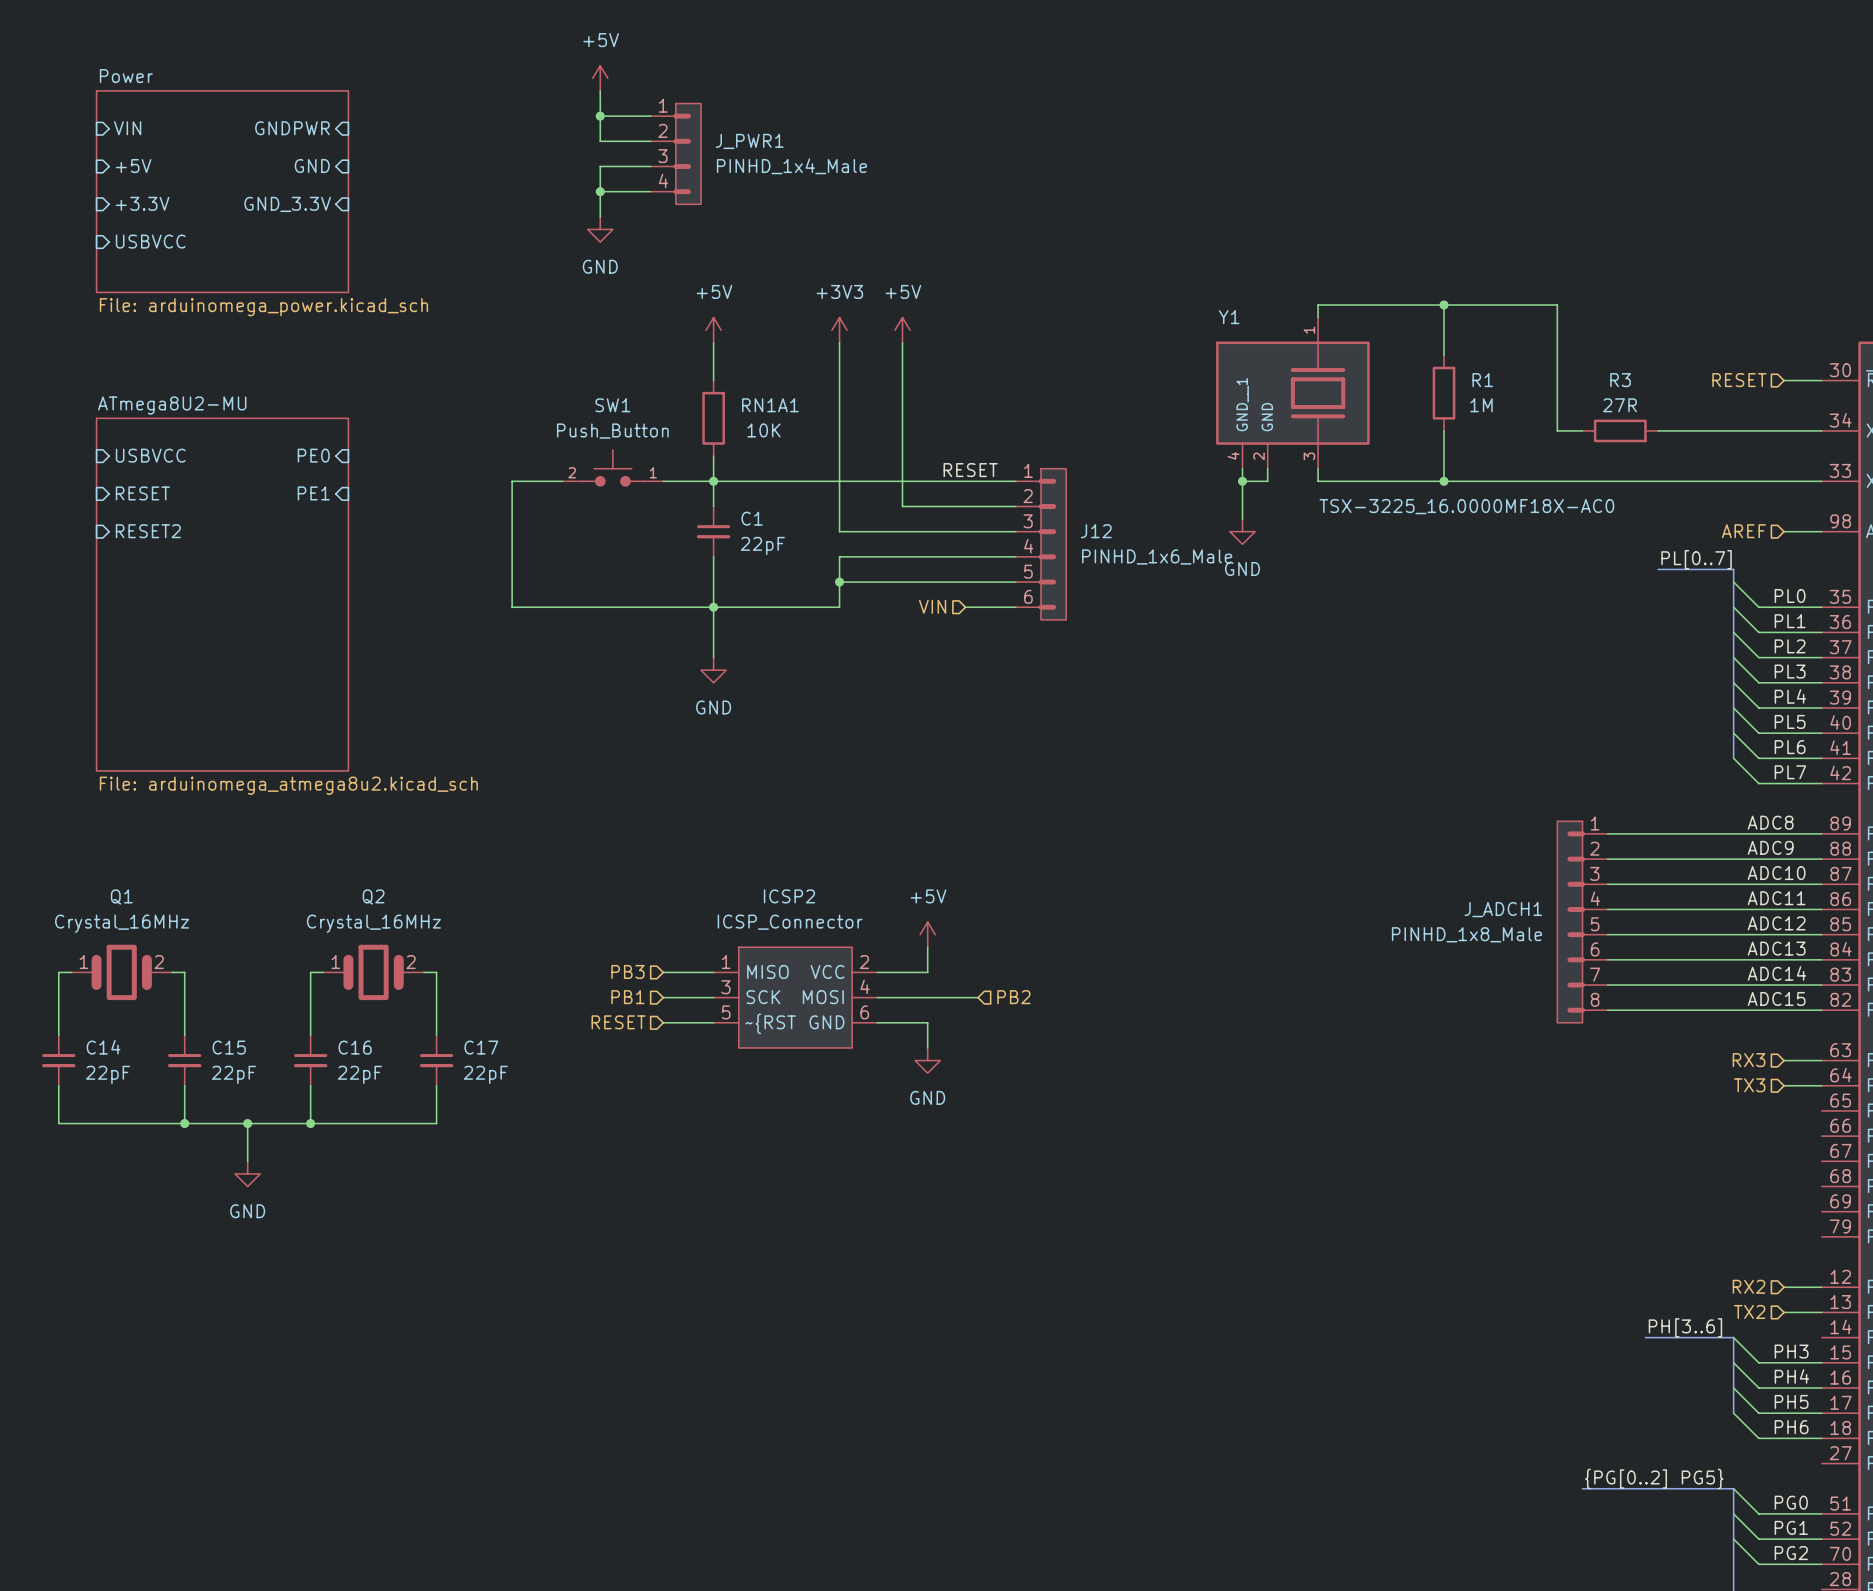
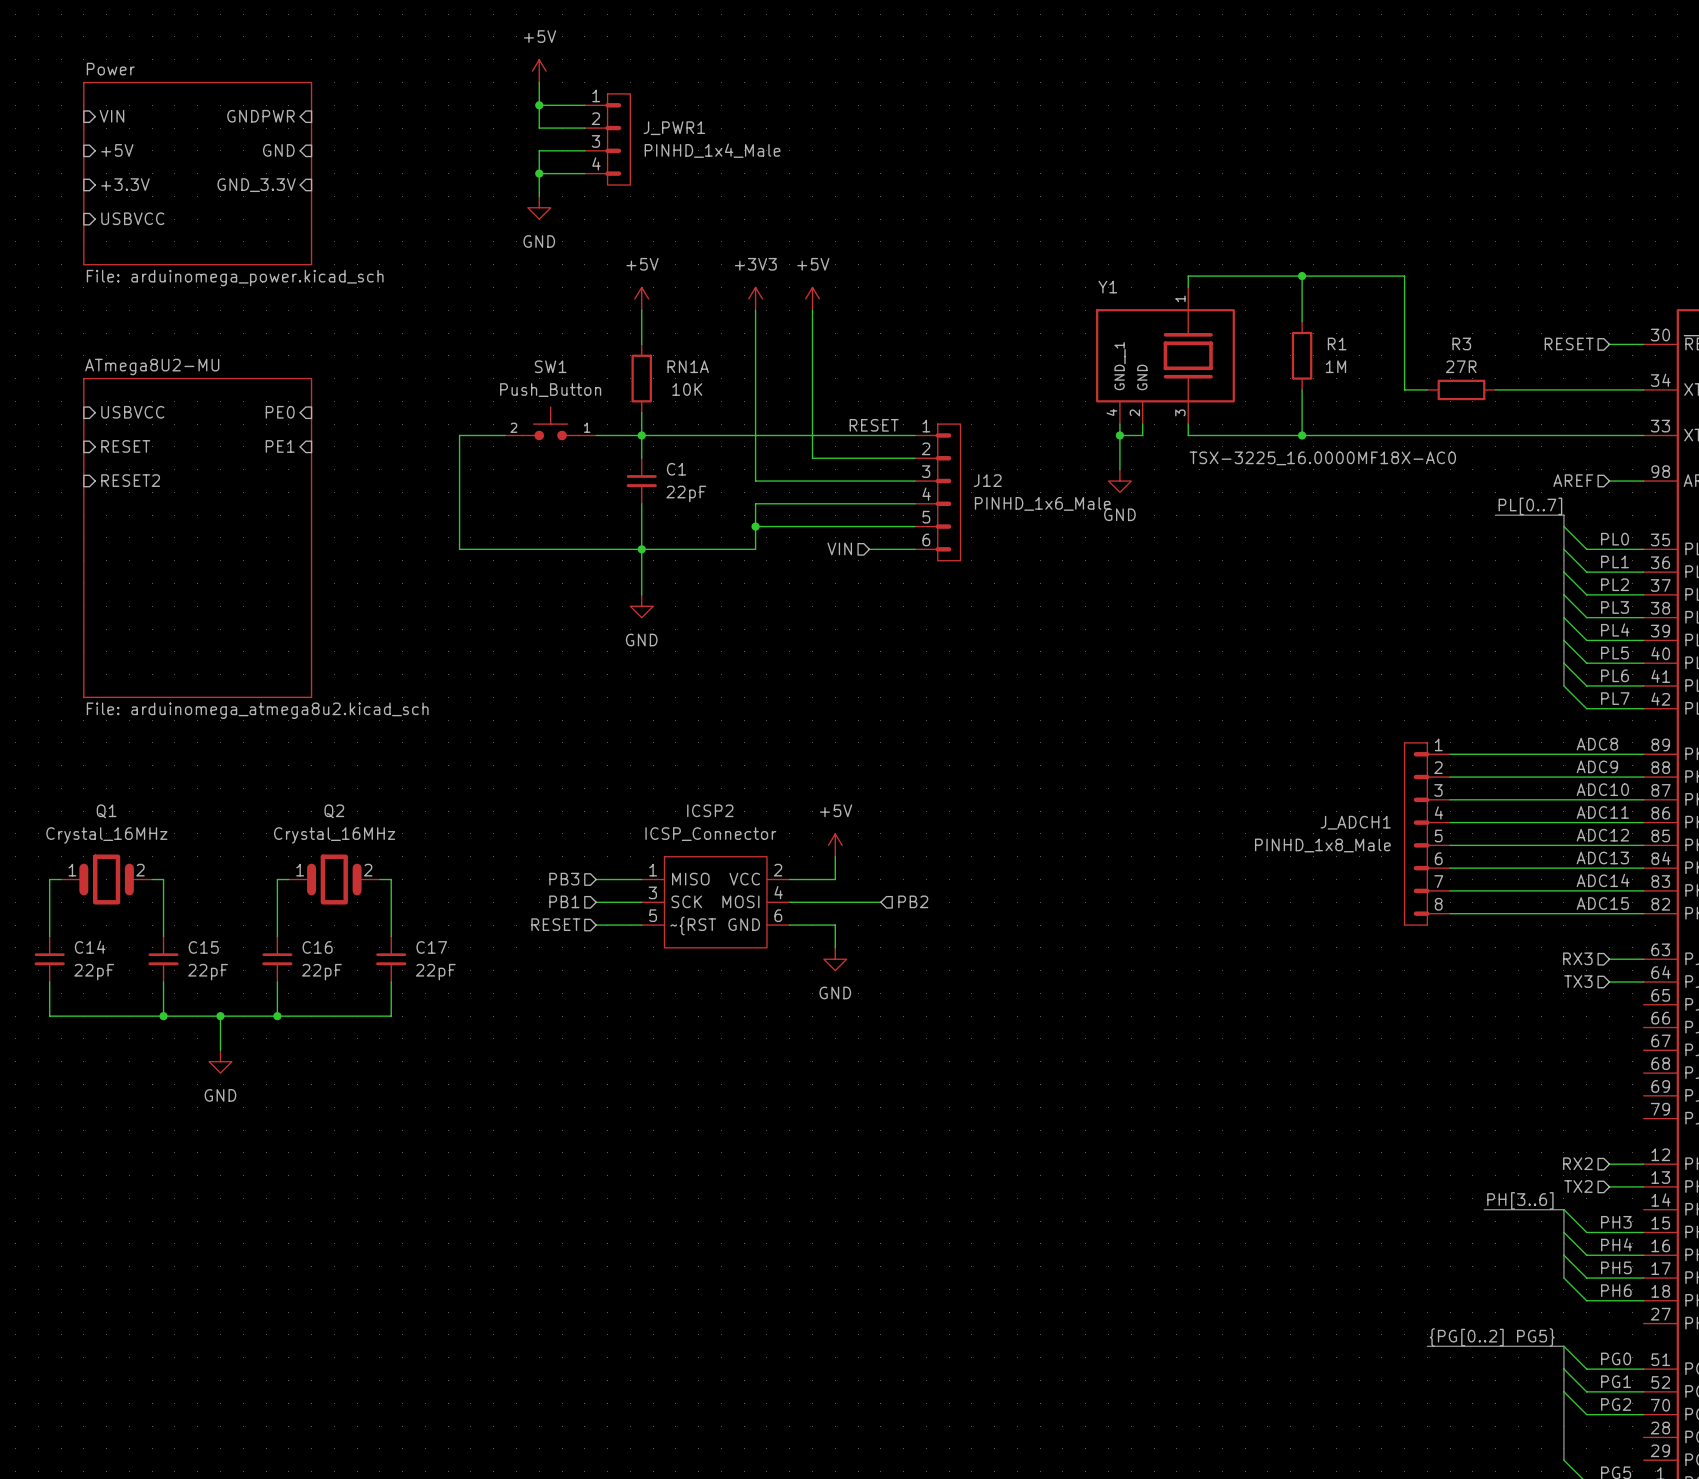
RN1A1 name: RN1A1 (770, 405) -> RN1A (688, 366)

